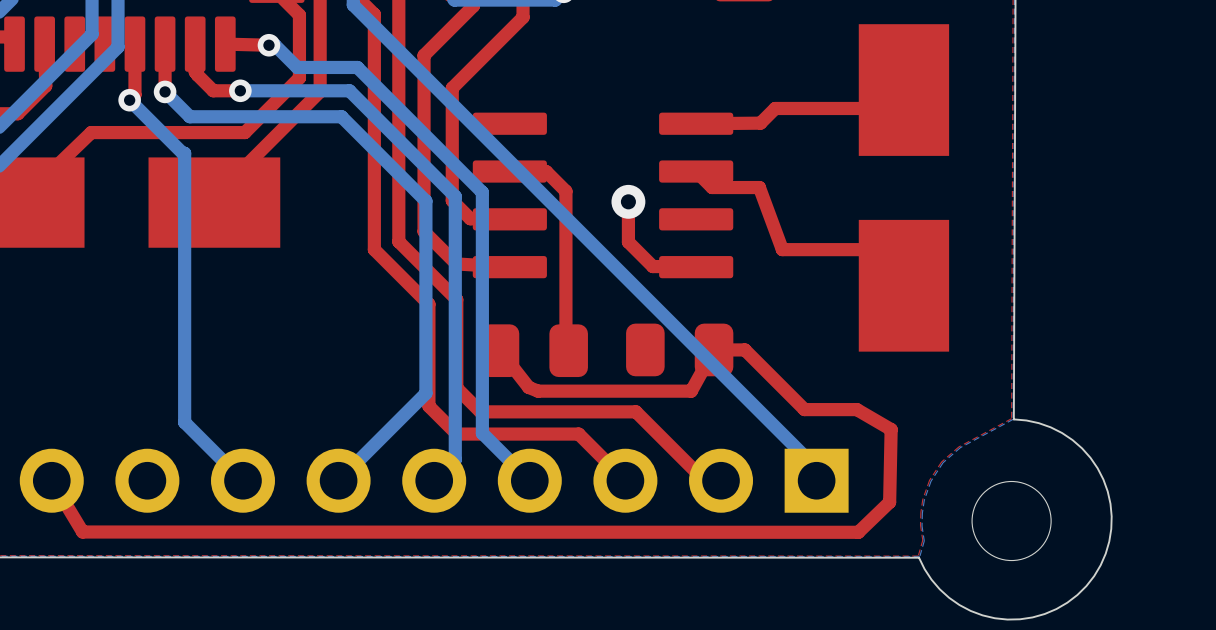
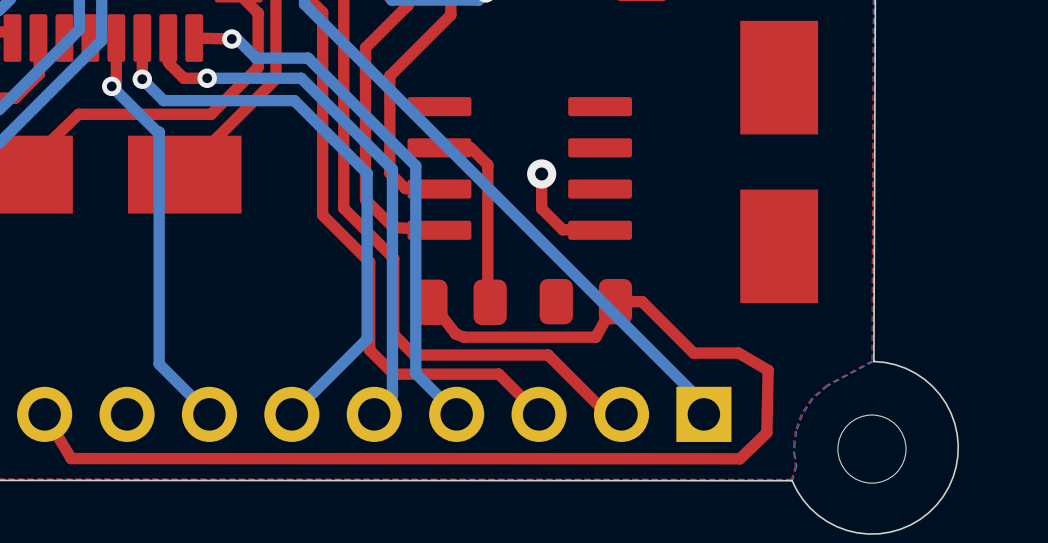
top track: (903, 90) (885, 108) (775, 108) (760, 123) (696, 123) -> none
top track: (696, 171) (712, 187) (759, 187) (782, 249) (867, 249) (903, 285) -> none

